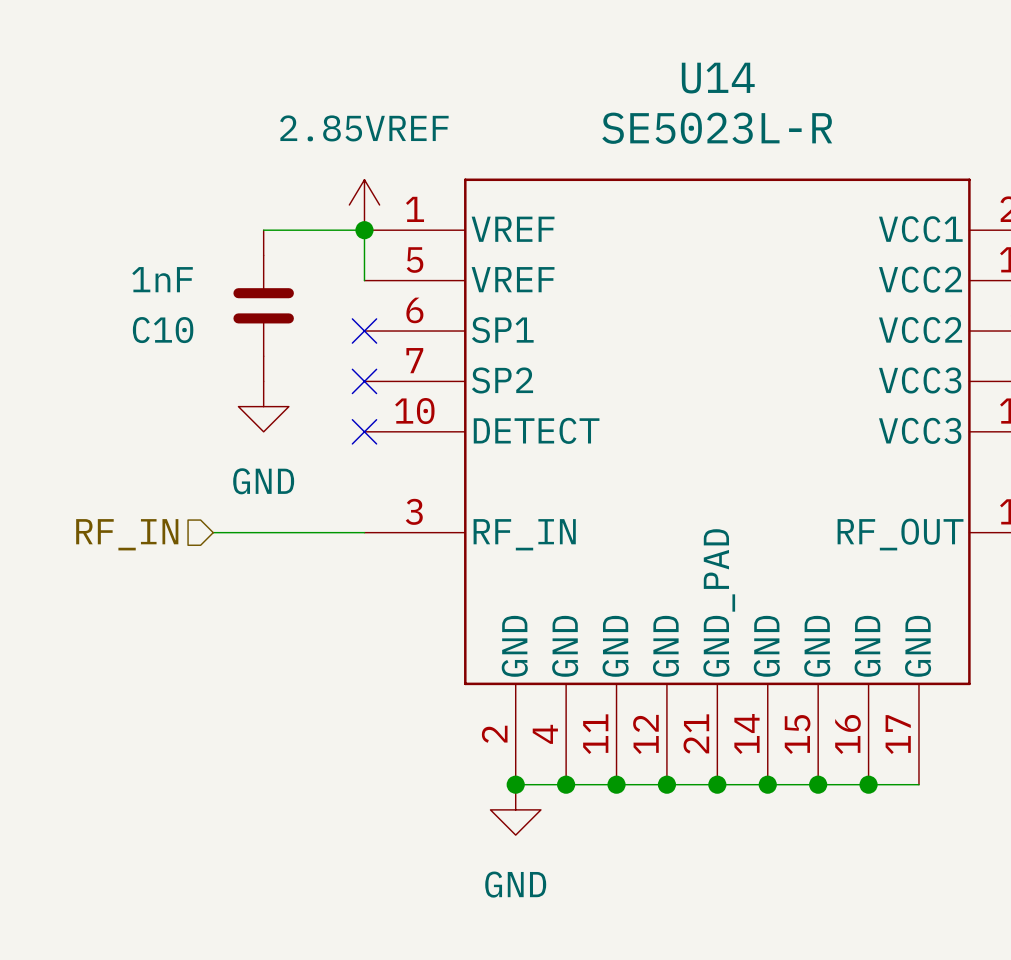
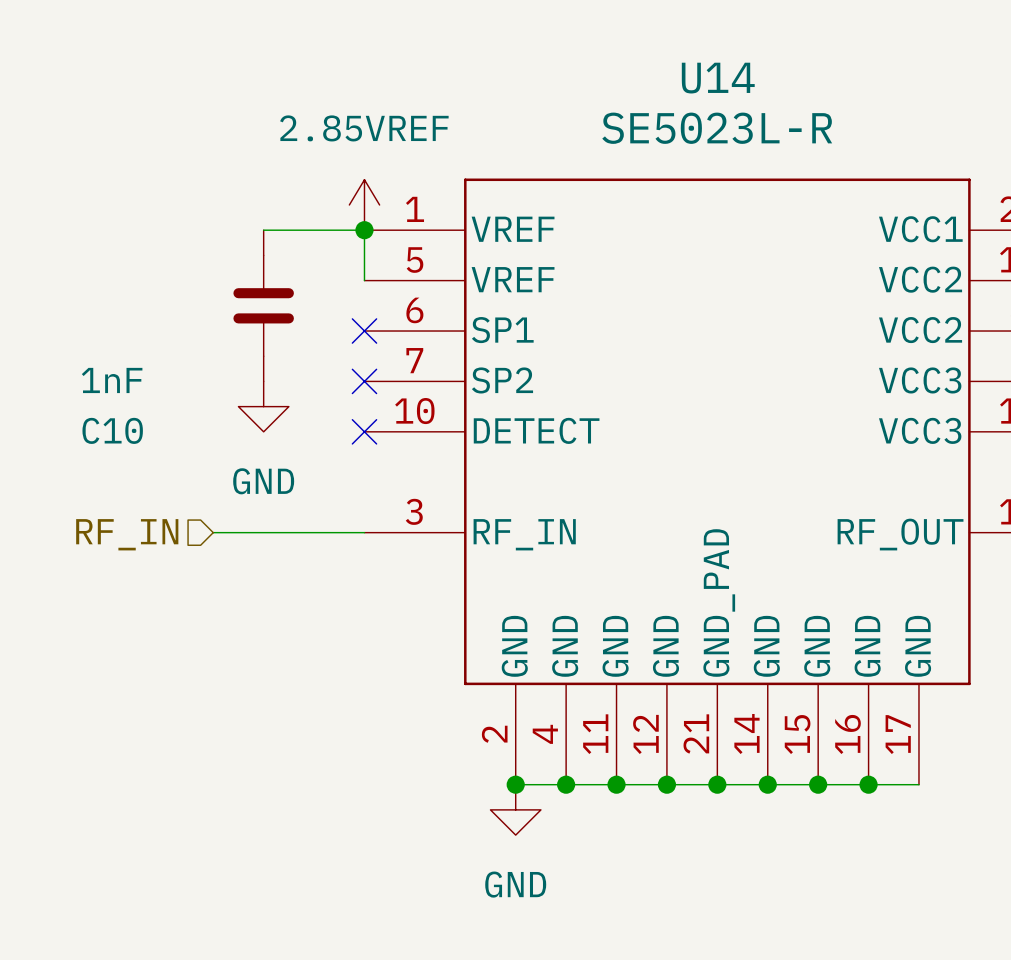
C10 value position: 1nF (162, 279) -> 1nF (112, 380)
C10 name position: C10 (163, 330) -> C10 (112, 430)

